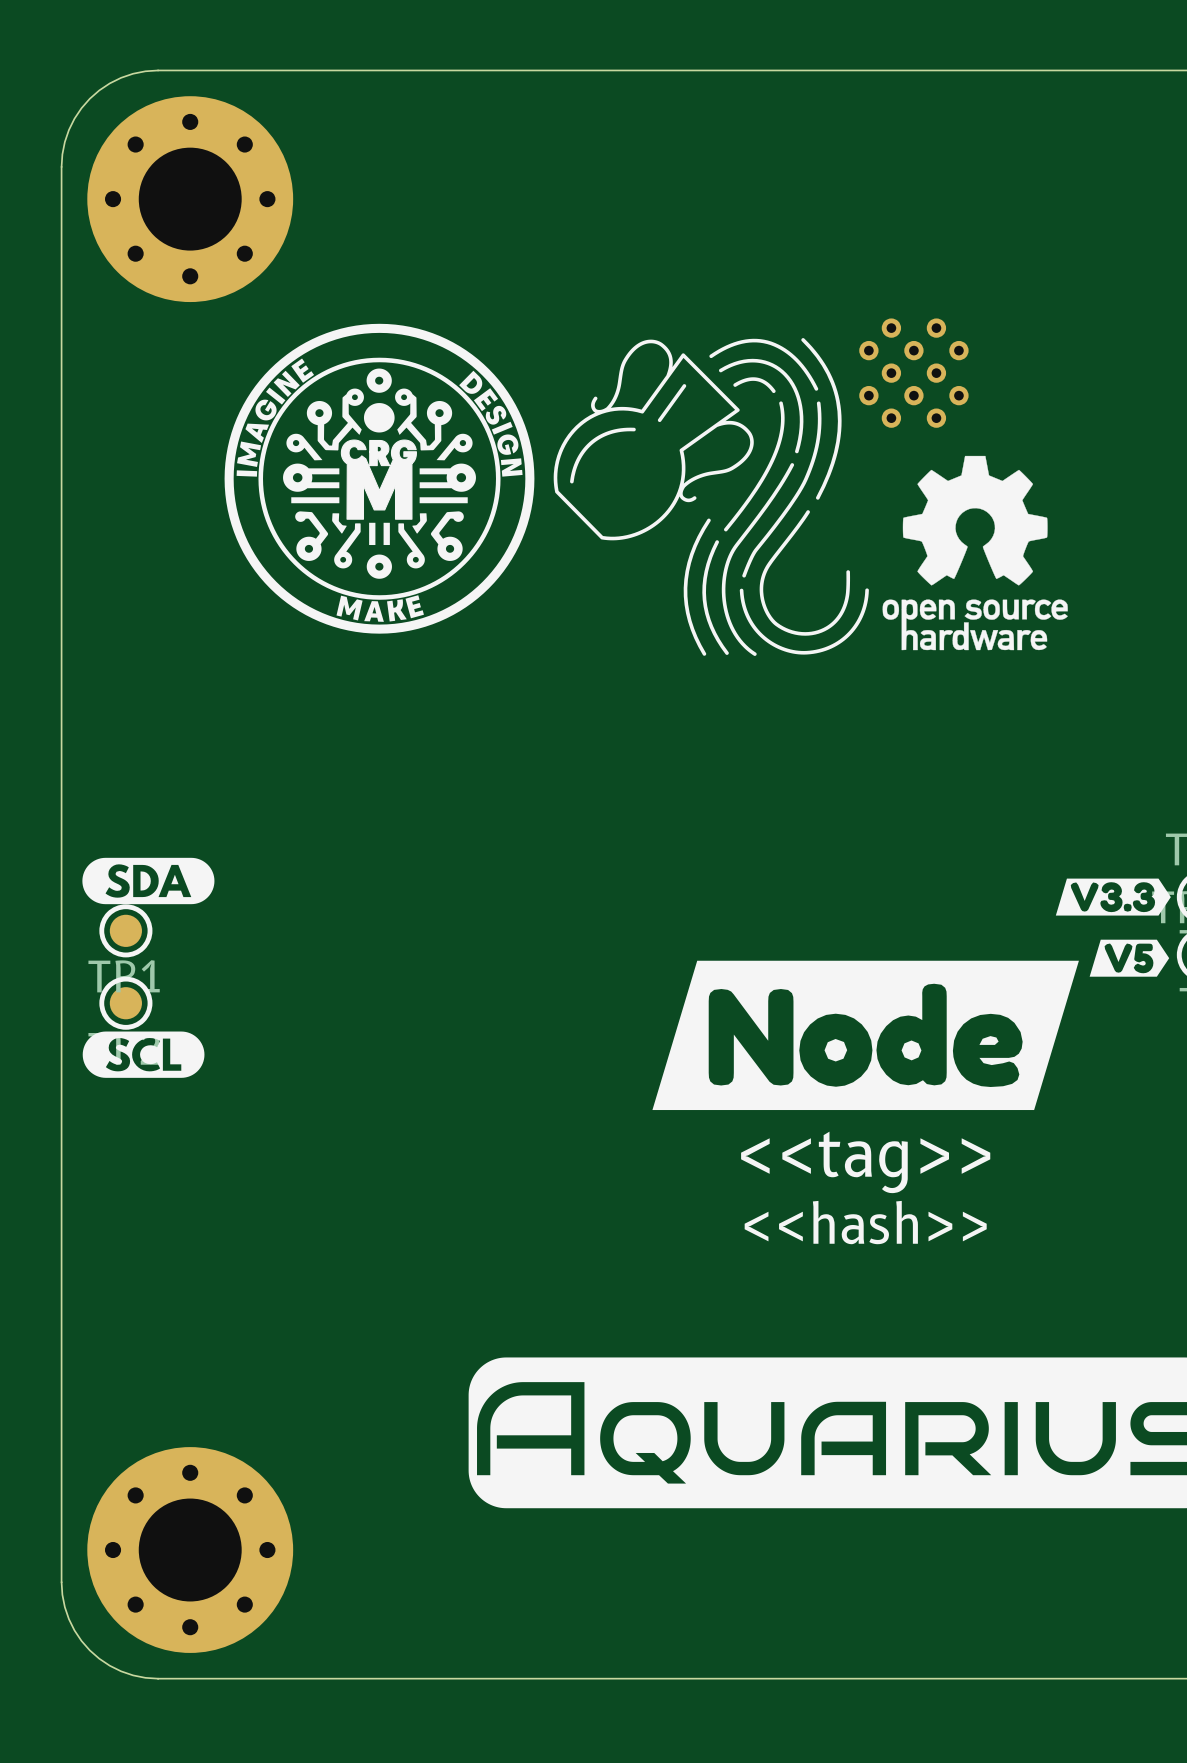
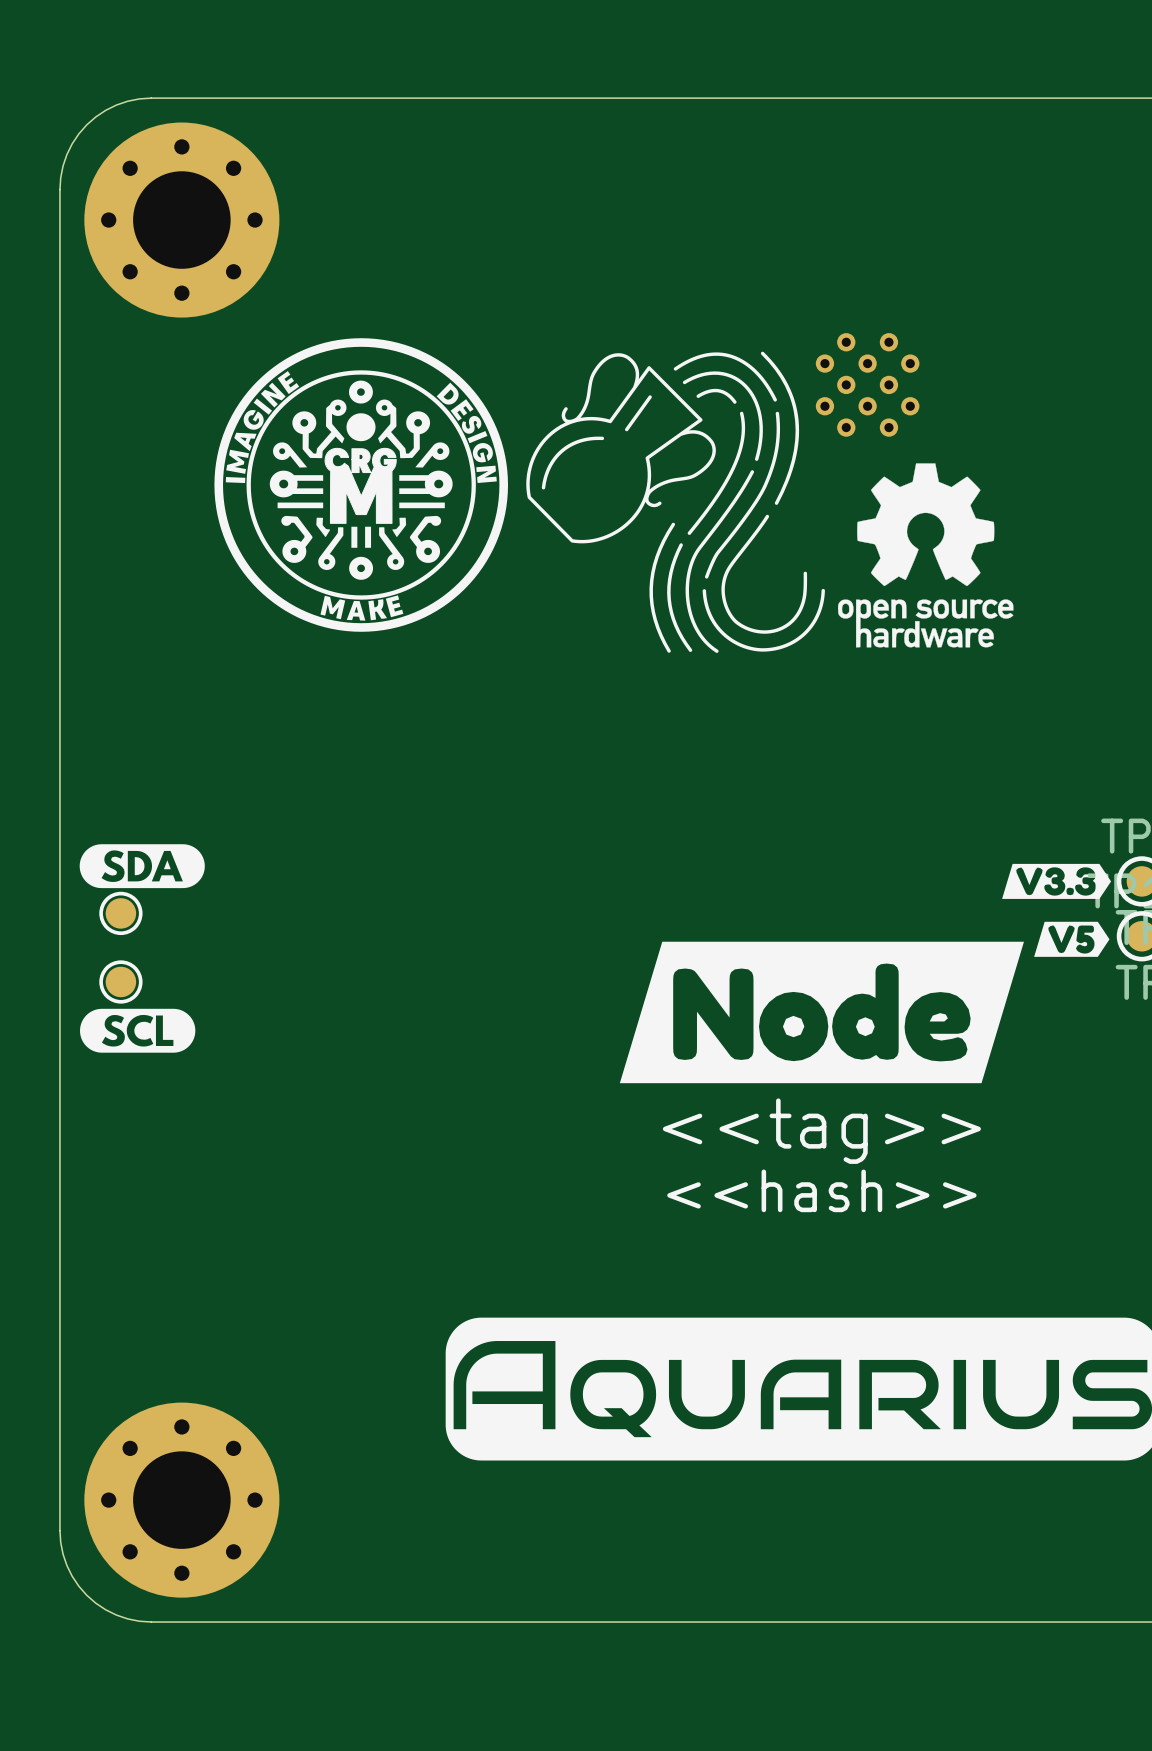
TP1: (125, 930) -> none
part: none -> (120, 913)
part: (125, 1003) -> none
part: none -> (120, 981)

